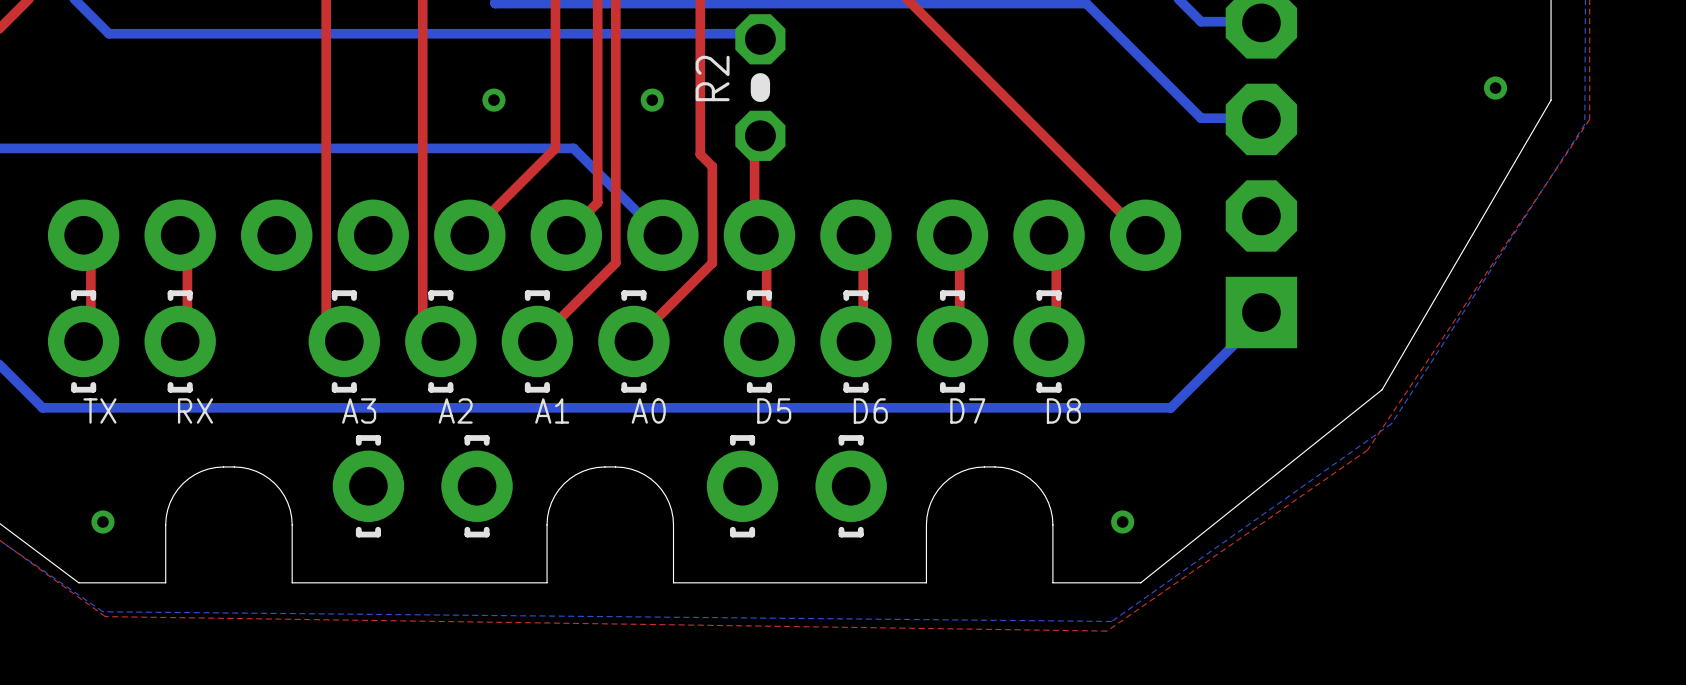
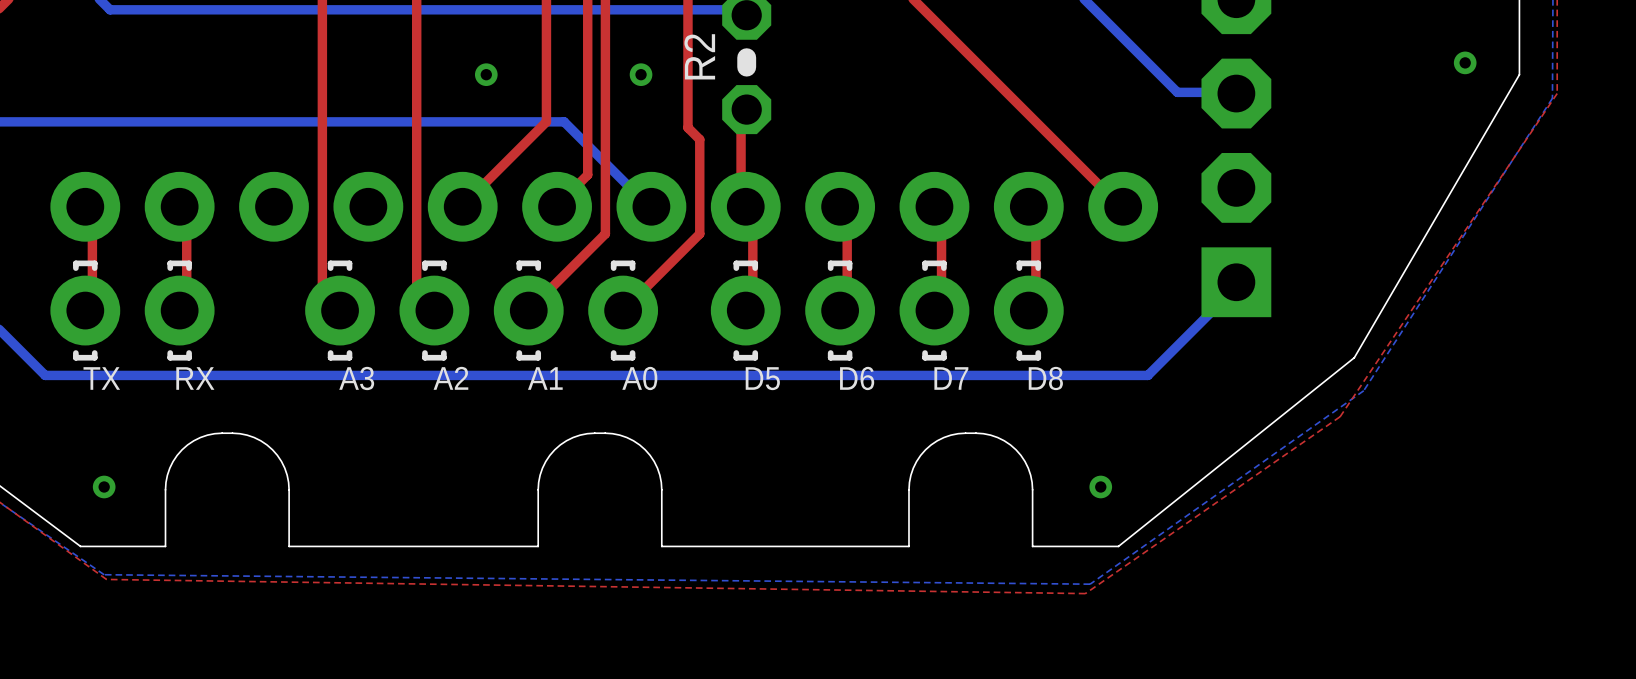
part: (368, 486) -> none
part: (477, 486) -> none
part: (742, 486) -> none
part: (851, 486) -> none

